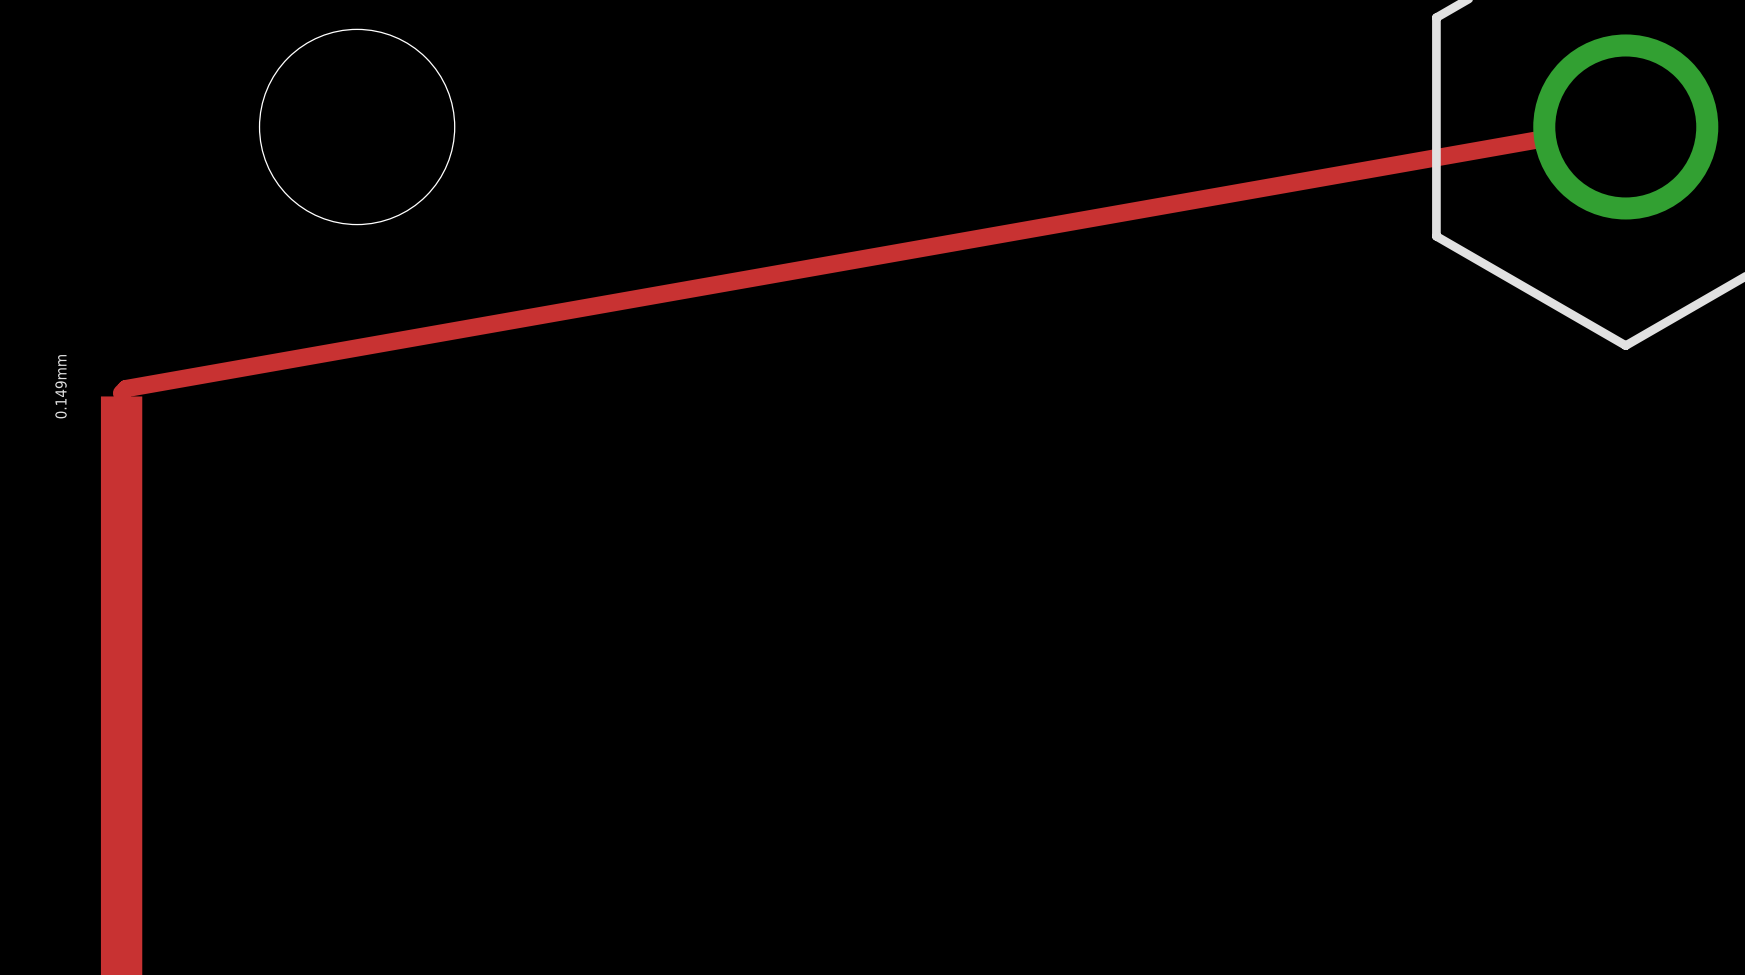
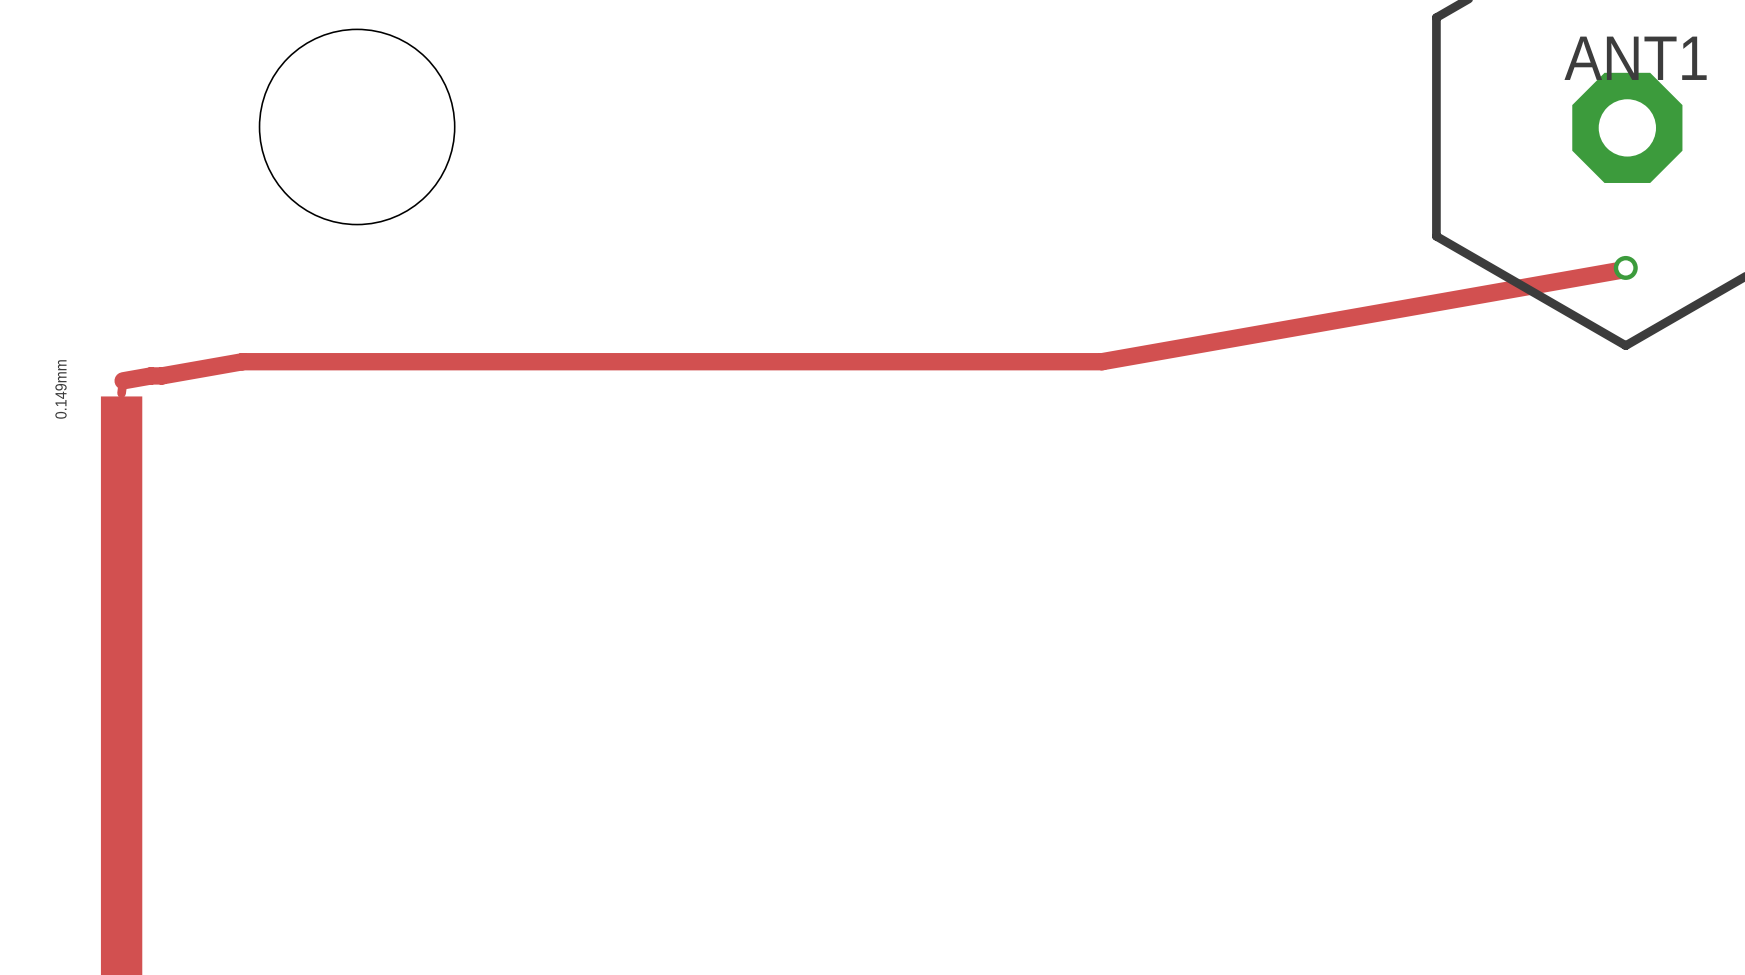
ANT1 name: none -> ANT1 (1635, 58)
track: (1625, 126) (1610, 126) (126, 388) (121, 393) -> (1625, 267) (1102, 361) (242, 361) (123, 380) (121, 393)
via: (1625, 126) -> none
via: none -> (1625, 267)

